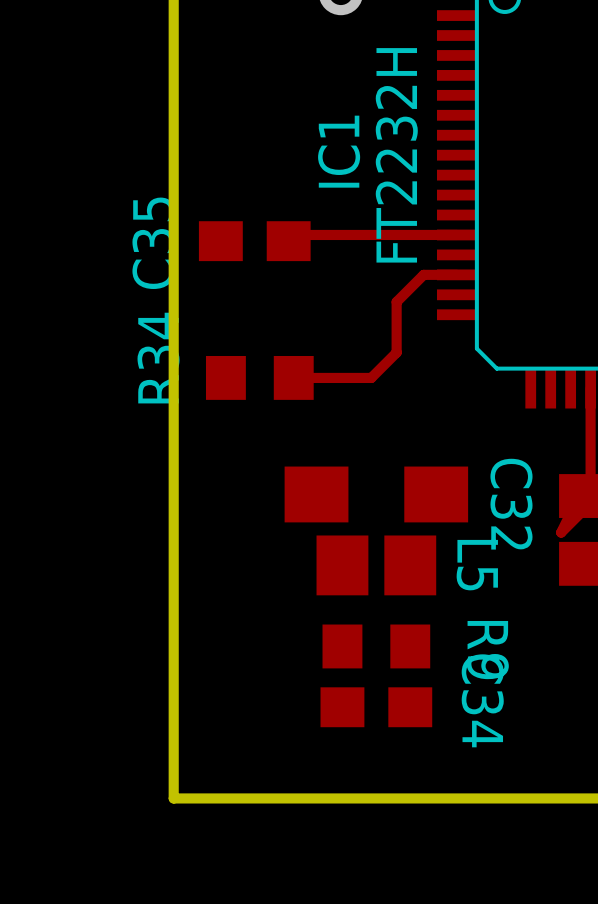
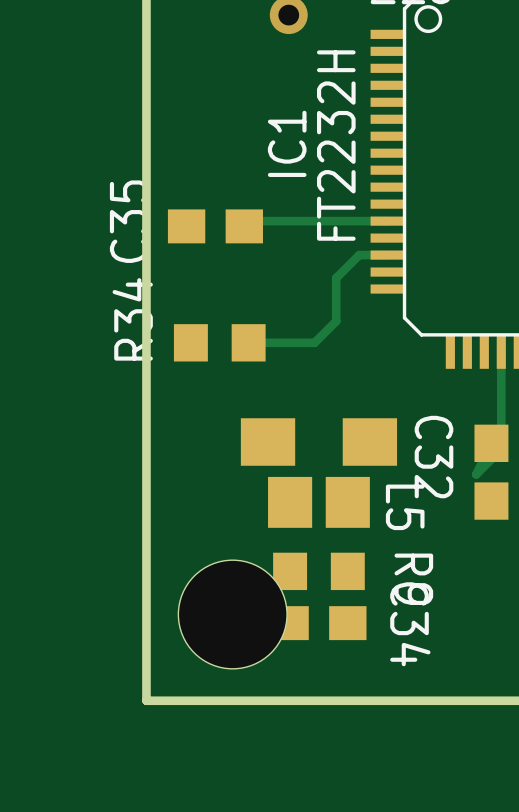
hole: none -> (232, 614)

